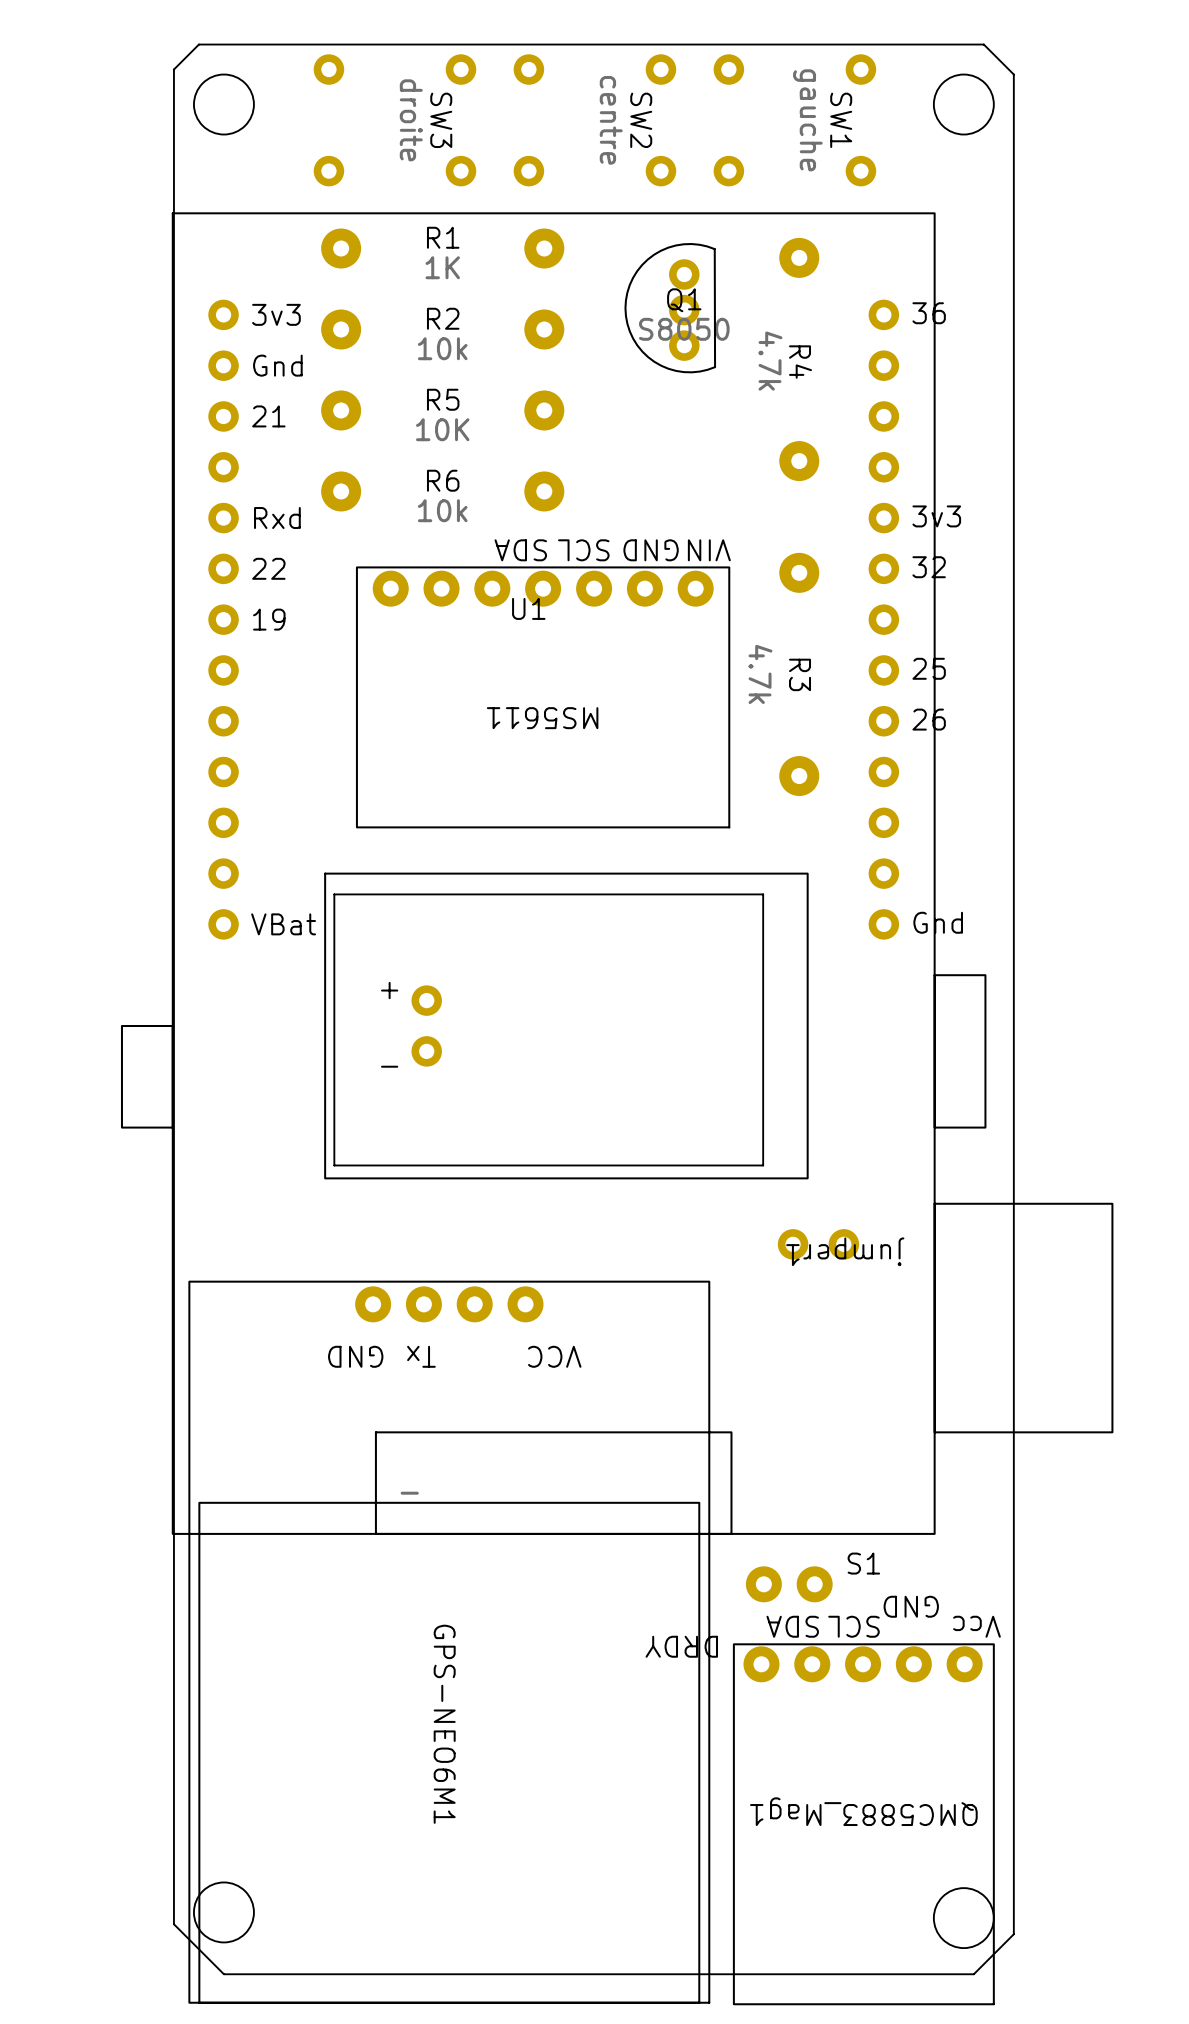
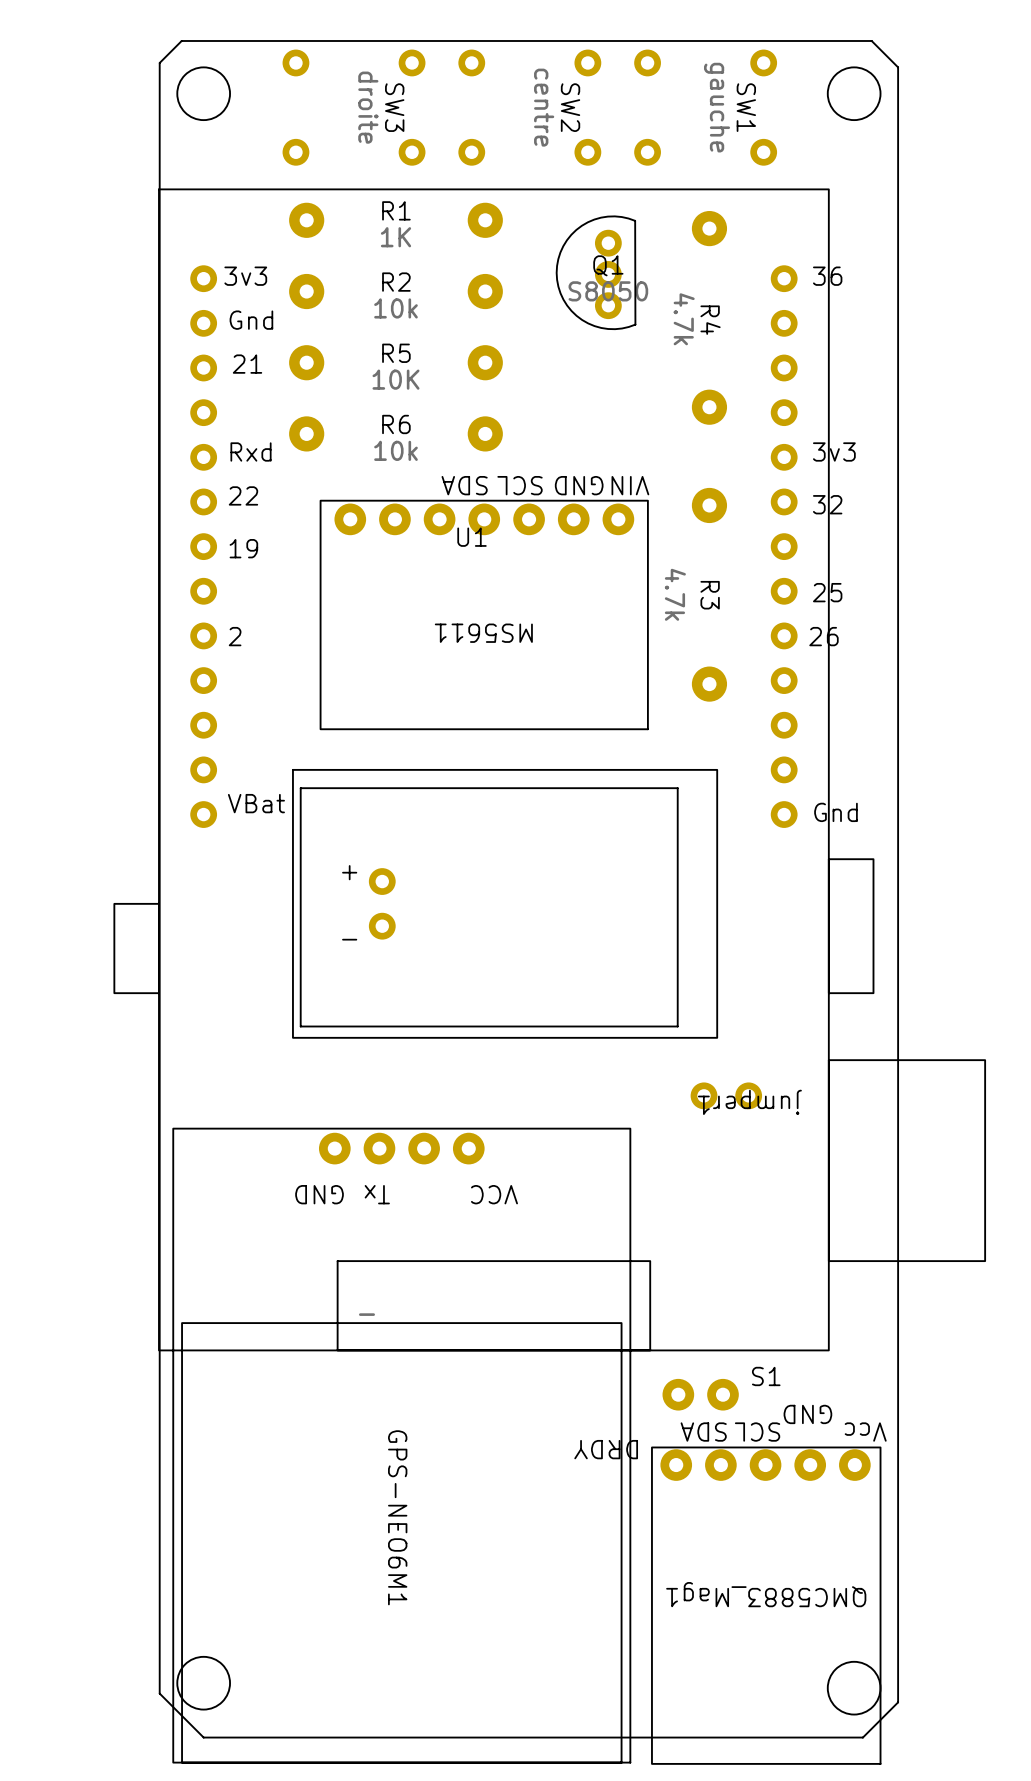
U1 footprint: [120, 212, 1114, 1535] -> [113, 188, 987, 1352]

